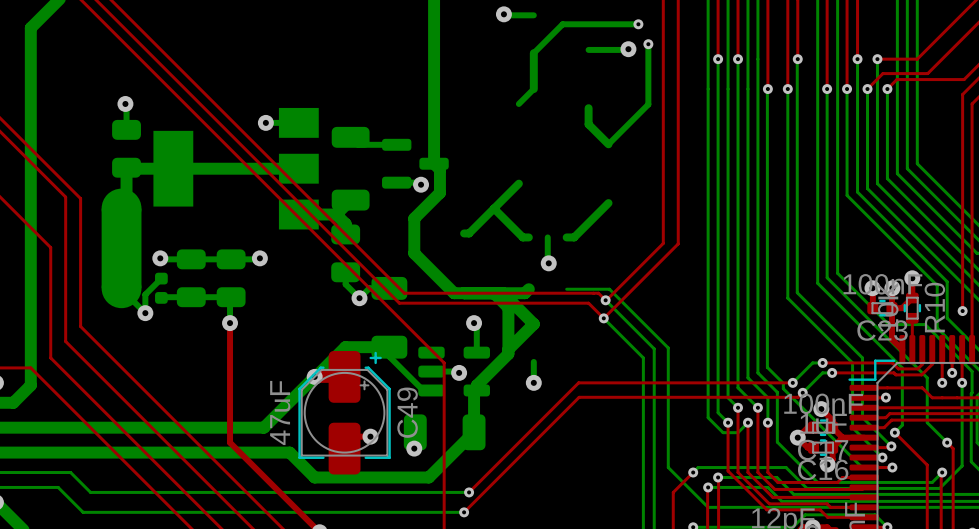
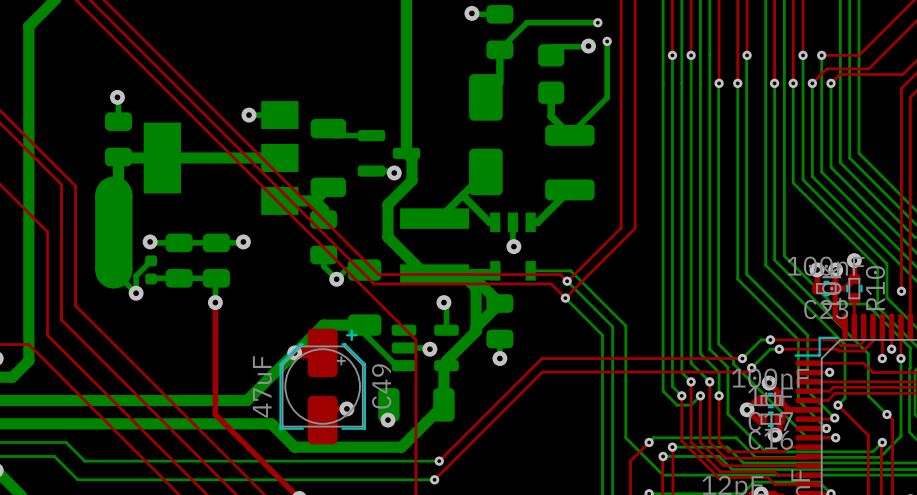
part: none -> (499, 32)
part: none -> (551, 74)
part: none -> (485, 134)
part: none -> (569, 162)
part: none -> (434, 246)
part: none -> (512, 246)
part: none -> (499, 321)

